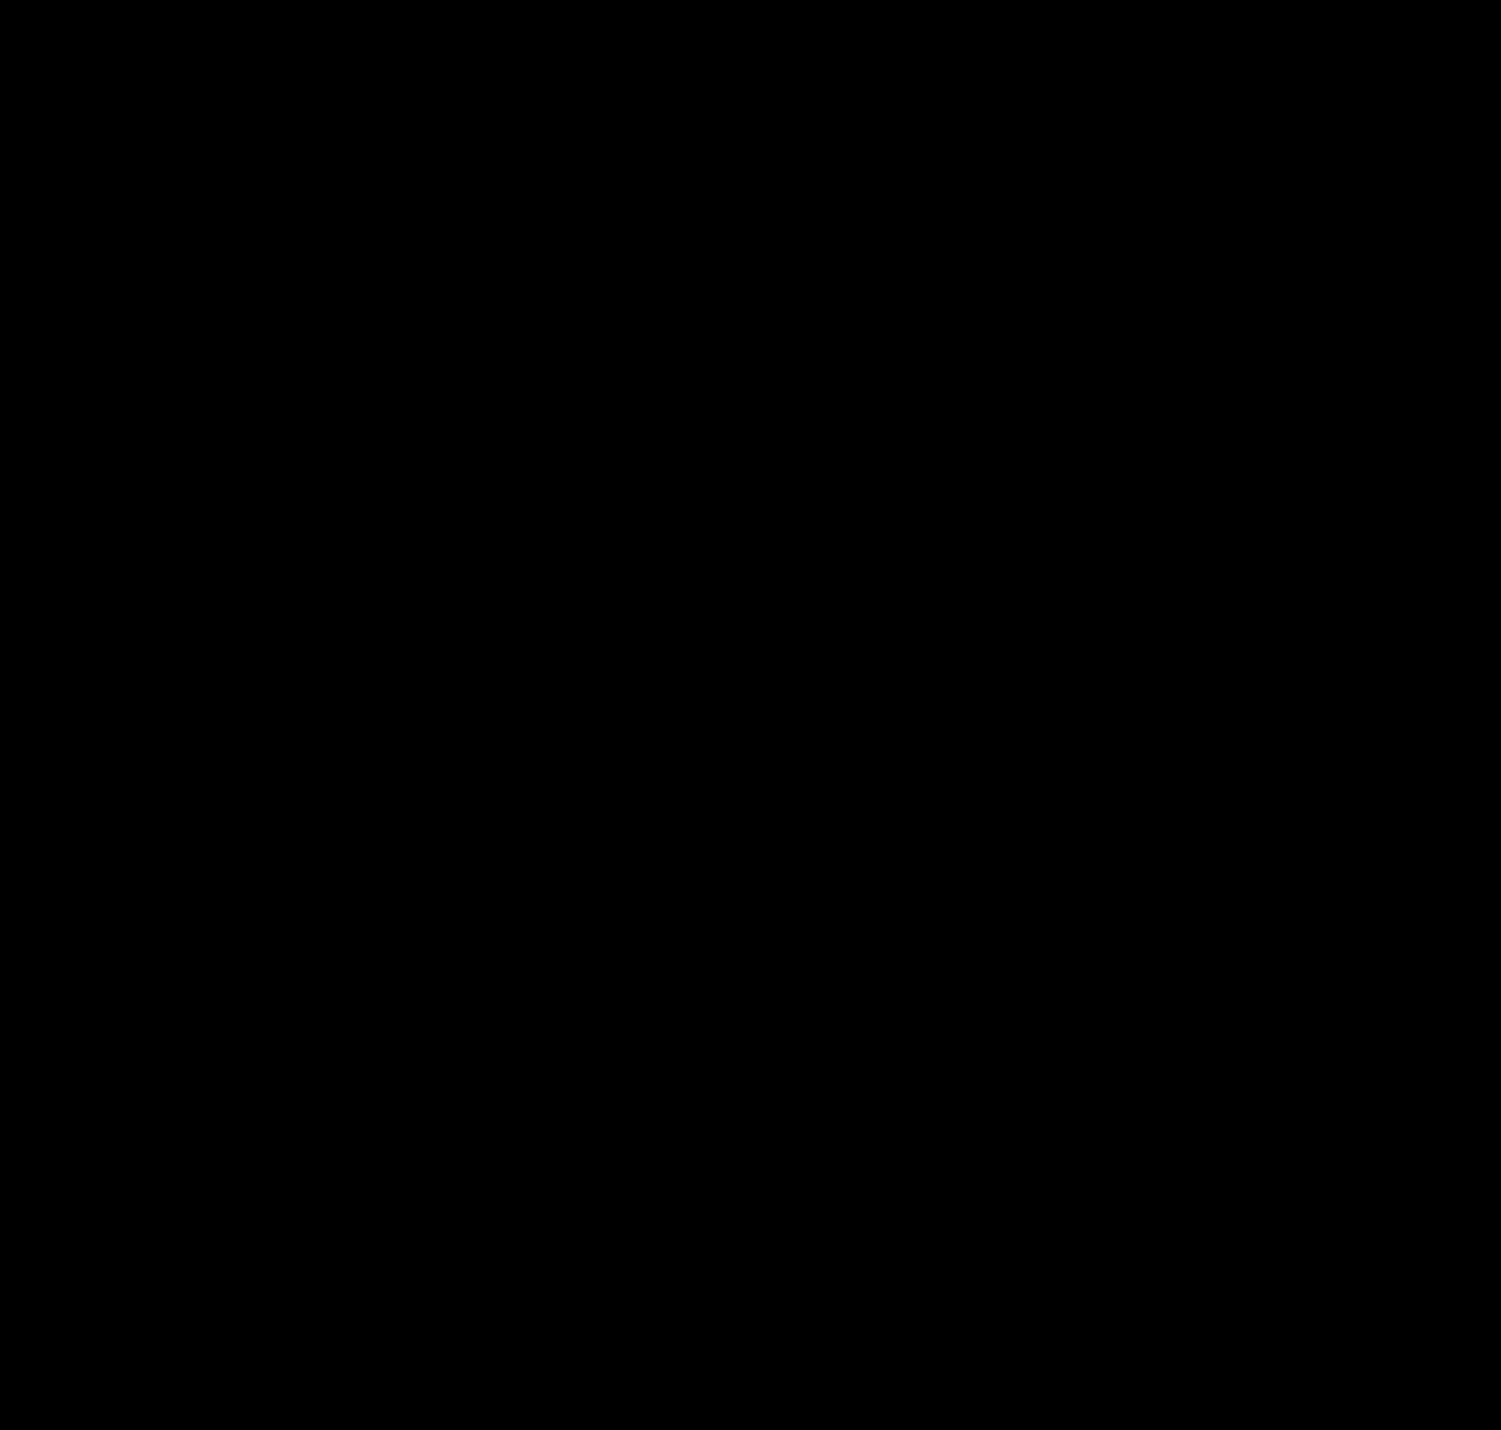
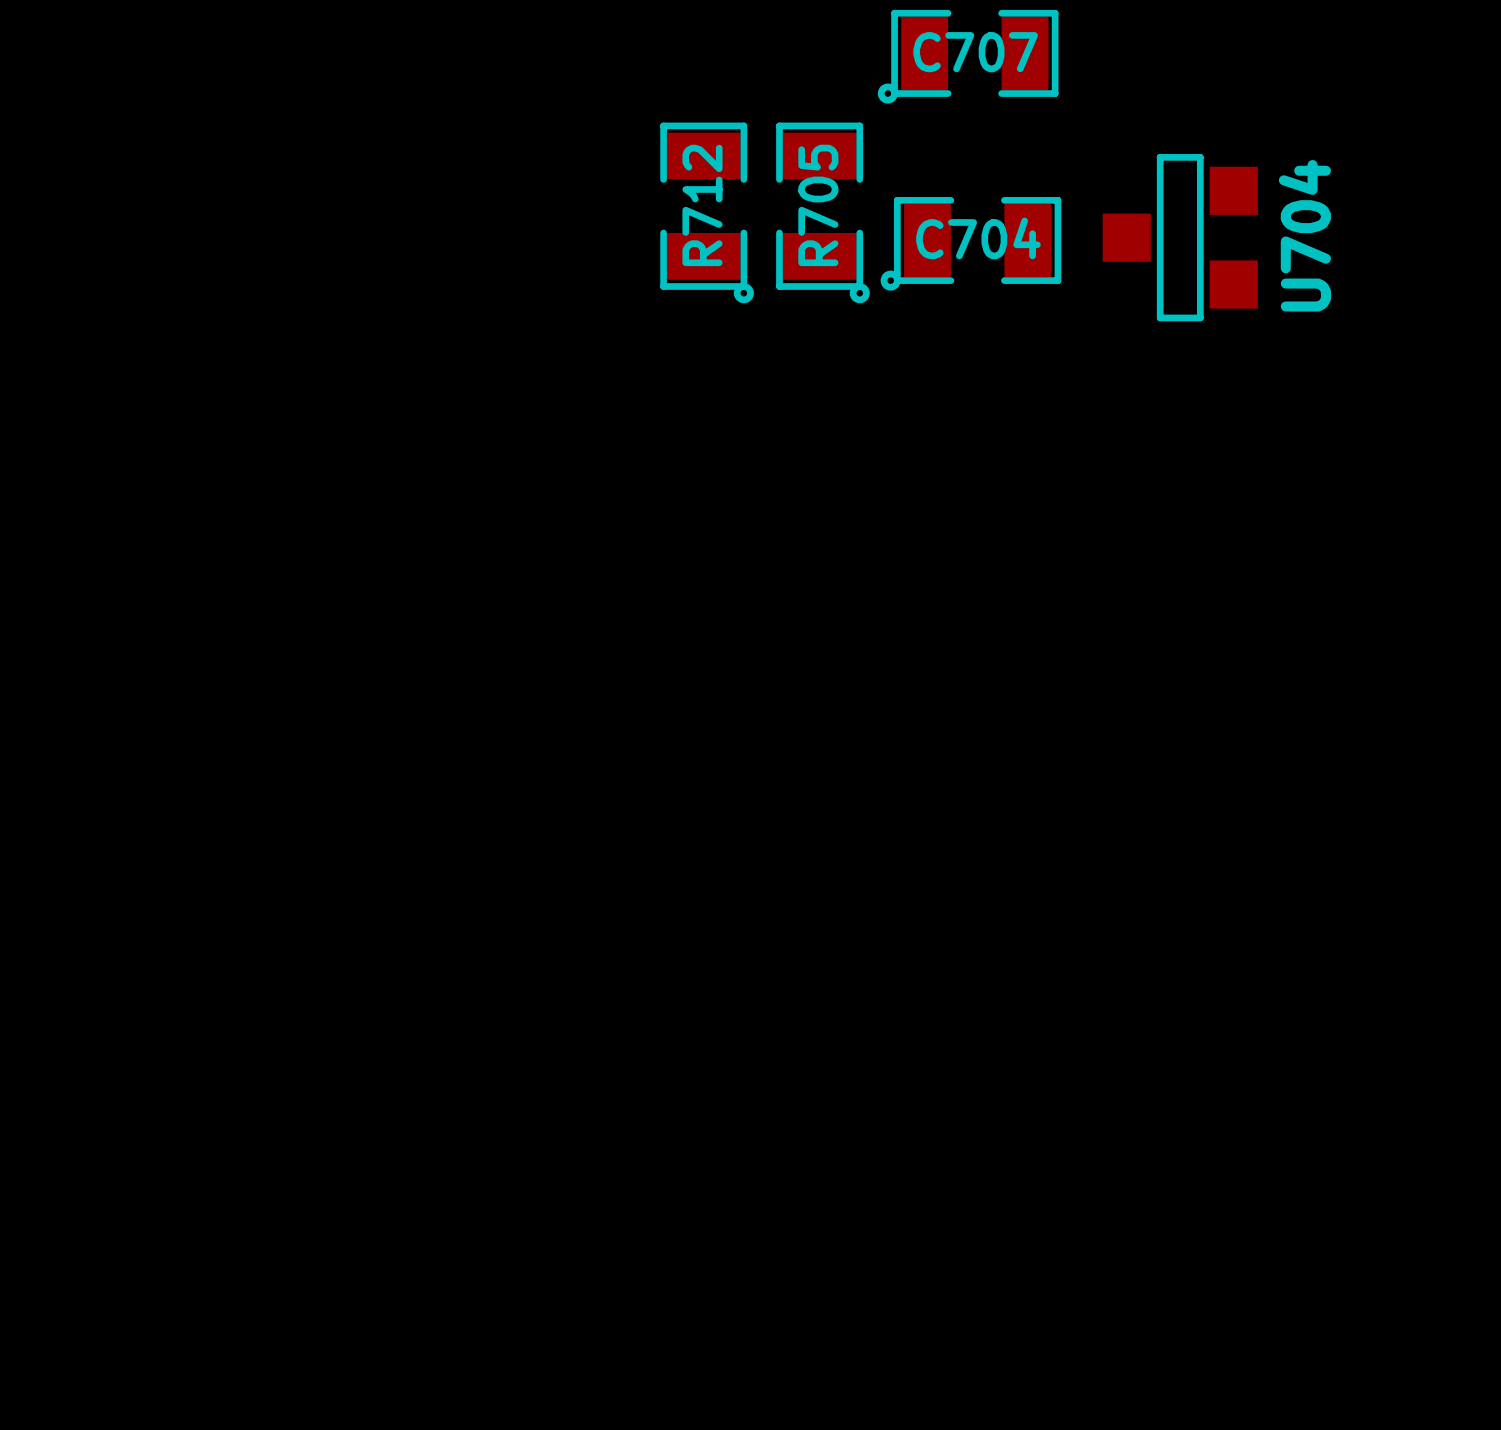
C707: none -> (968, 56)
R712: none -> (707, 212)
R705: none -> (822, 212)
U704: none -> (1180, 237)
C704: none -> (970, 243)

